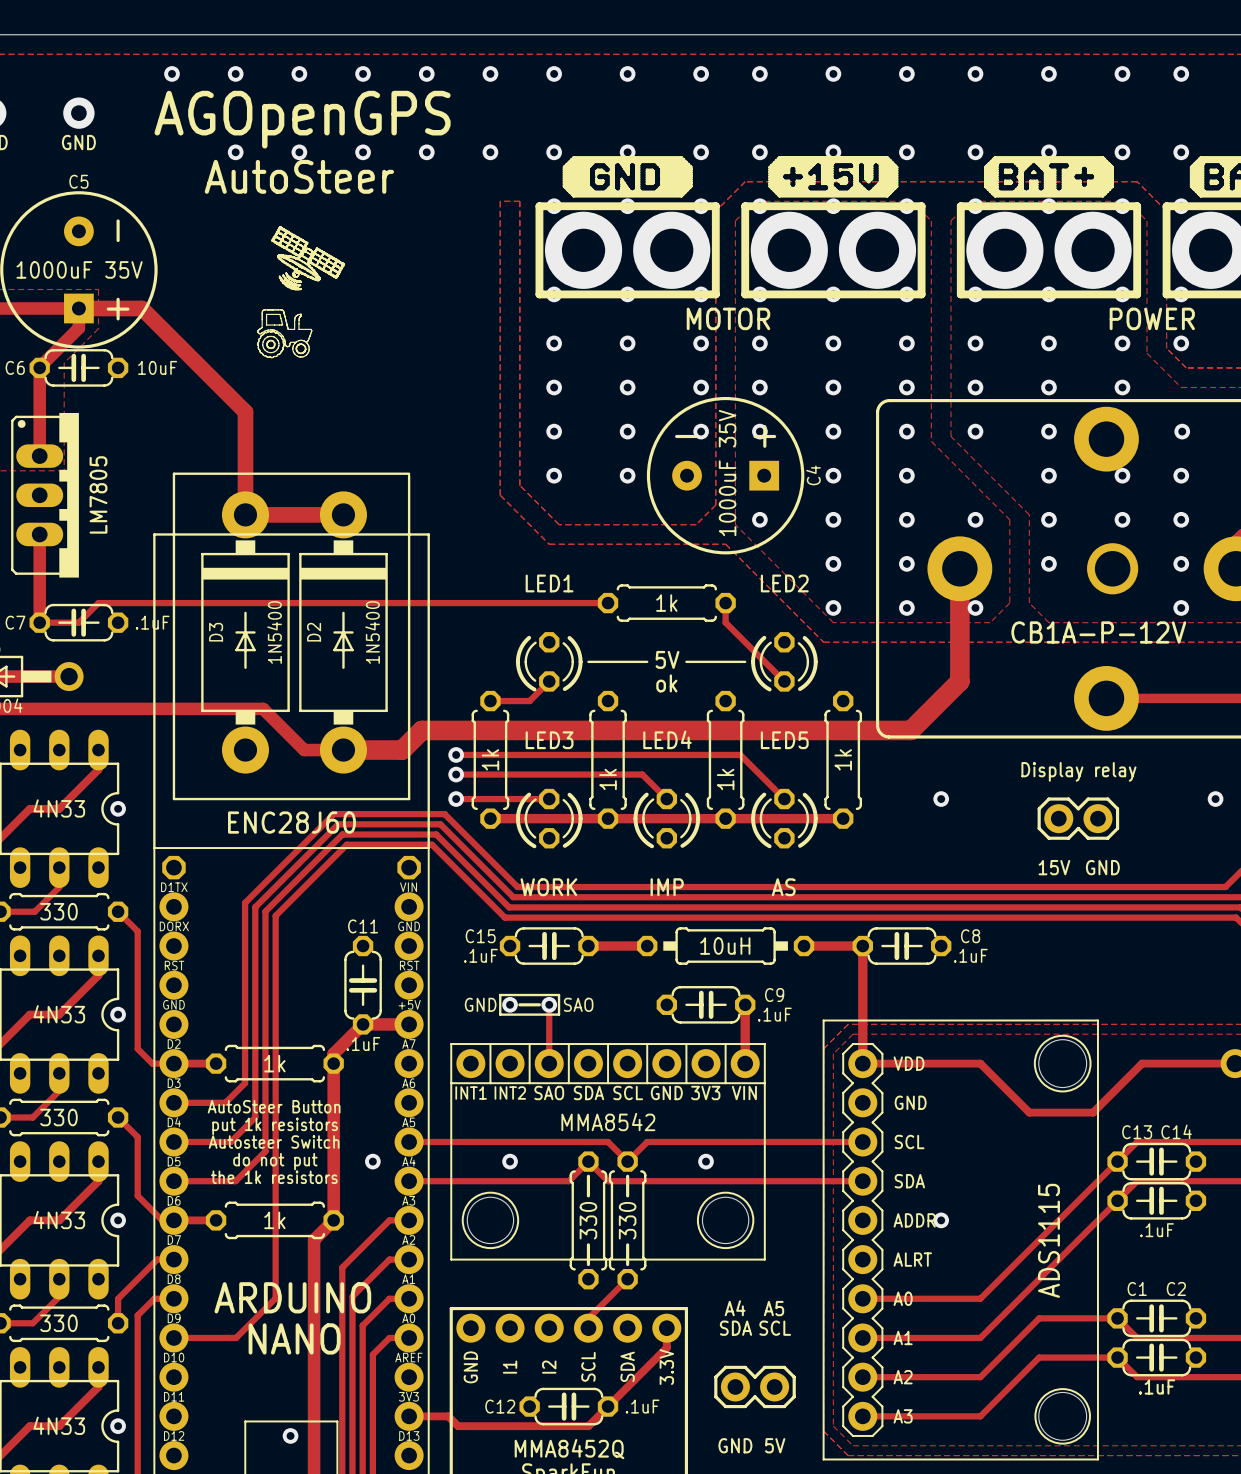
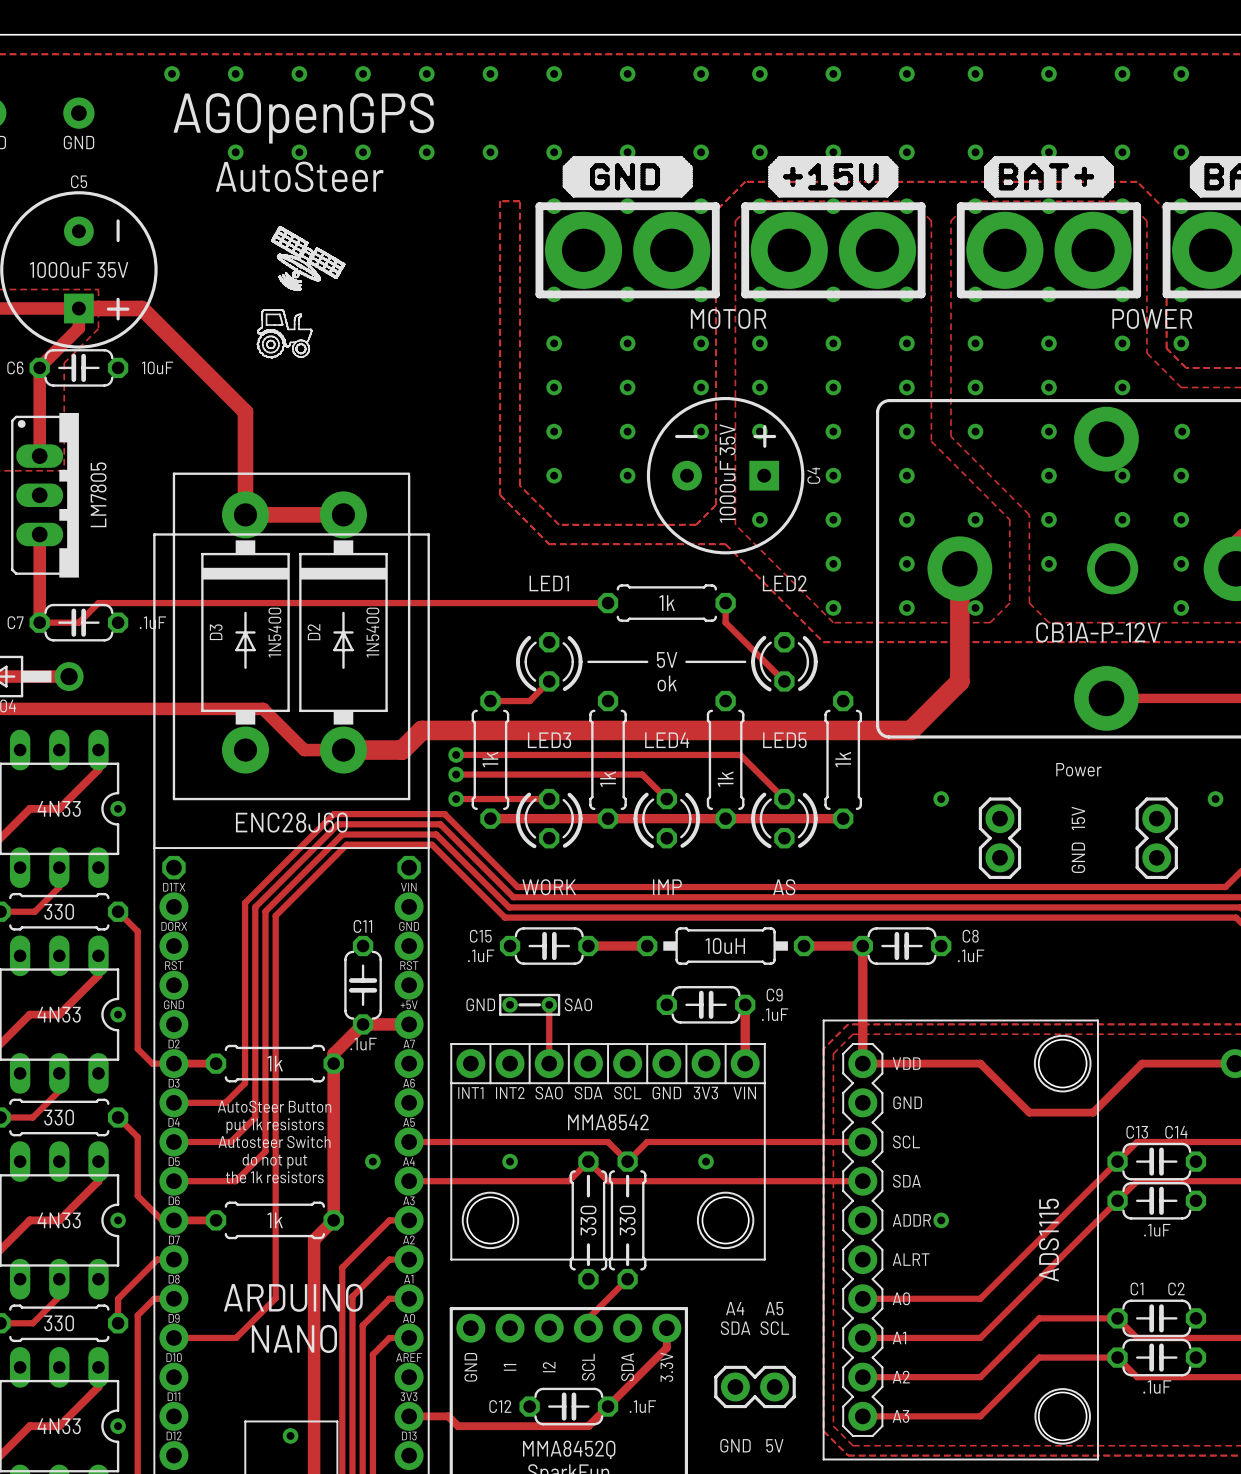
text: Display relay (1078, 771) -> Power (1078, 769)
part: (1078, 818) -> none
part: none -> (999, 838)
part: none -> (1156, 838)
text rotation: 0° (1054, 867) -> 90° counterclockwise (1078, 818)
text position: 15V (1054, 867) -> 15V (1078, 818)
text rotation: 0° (1102, 867) -> 90° counterclockwise (1078, 857)

